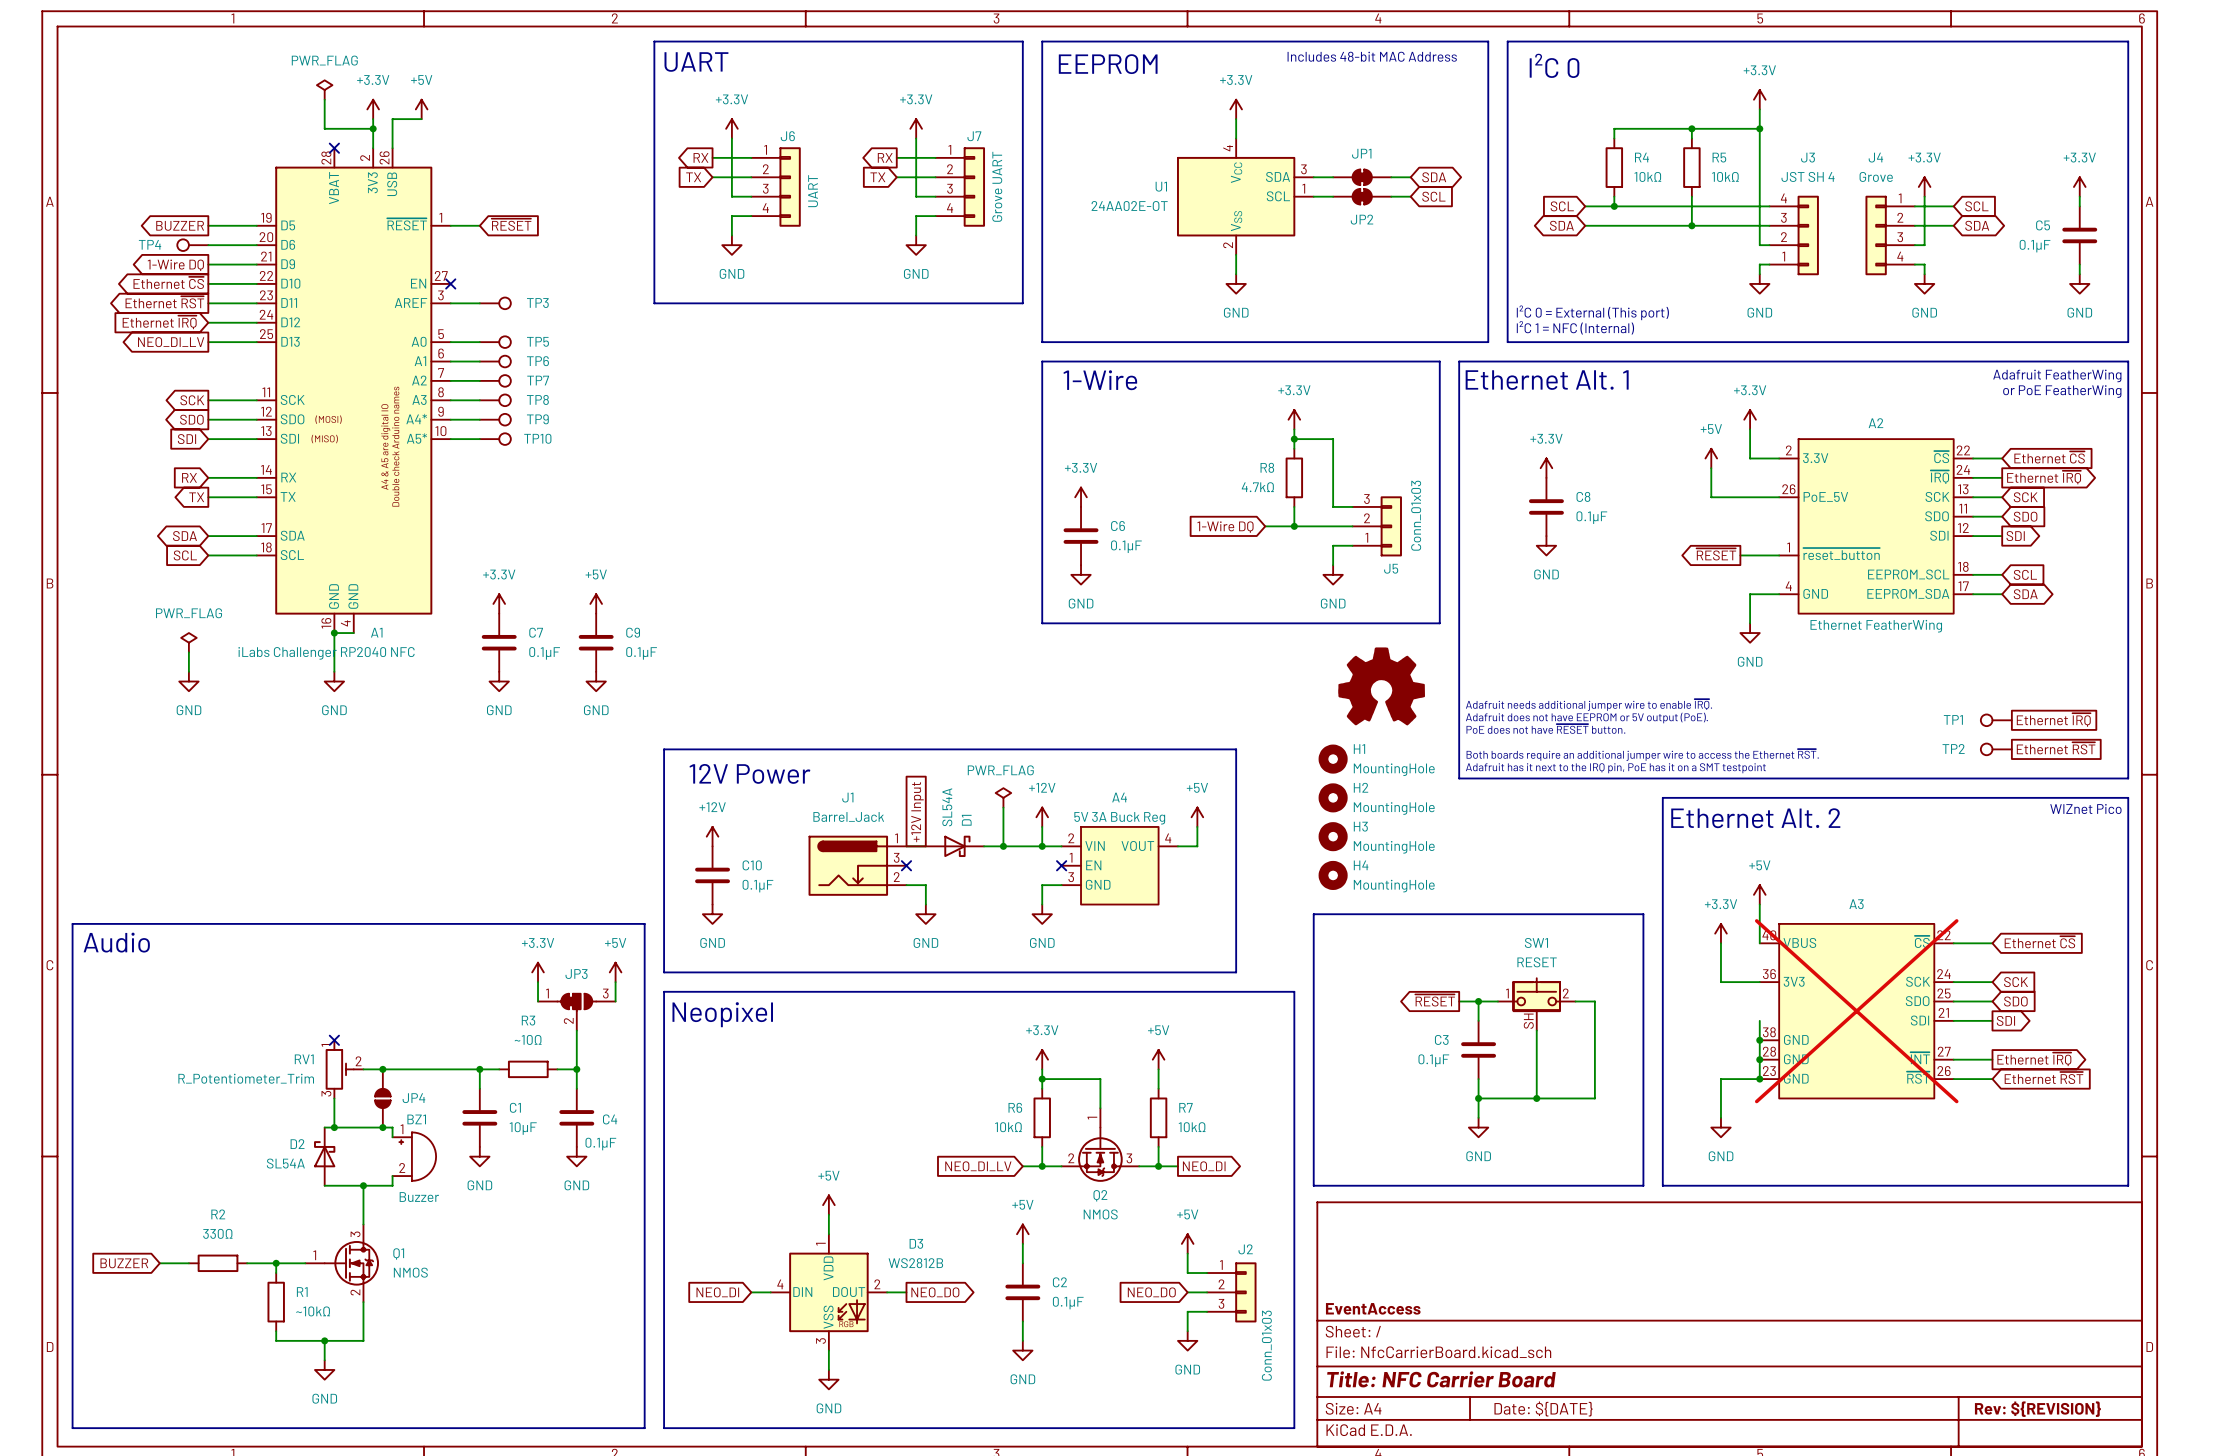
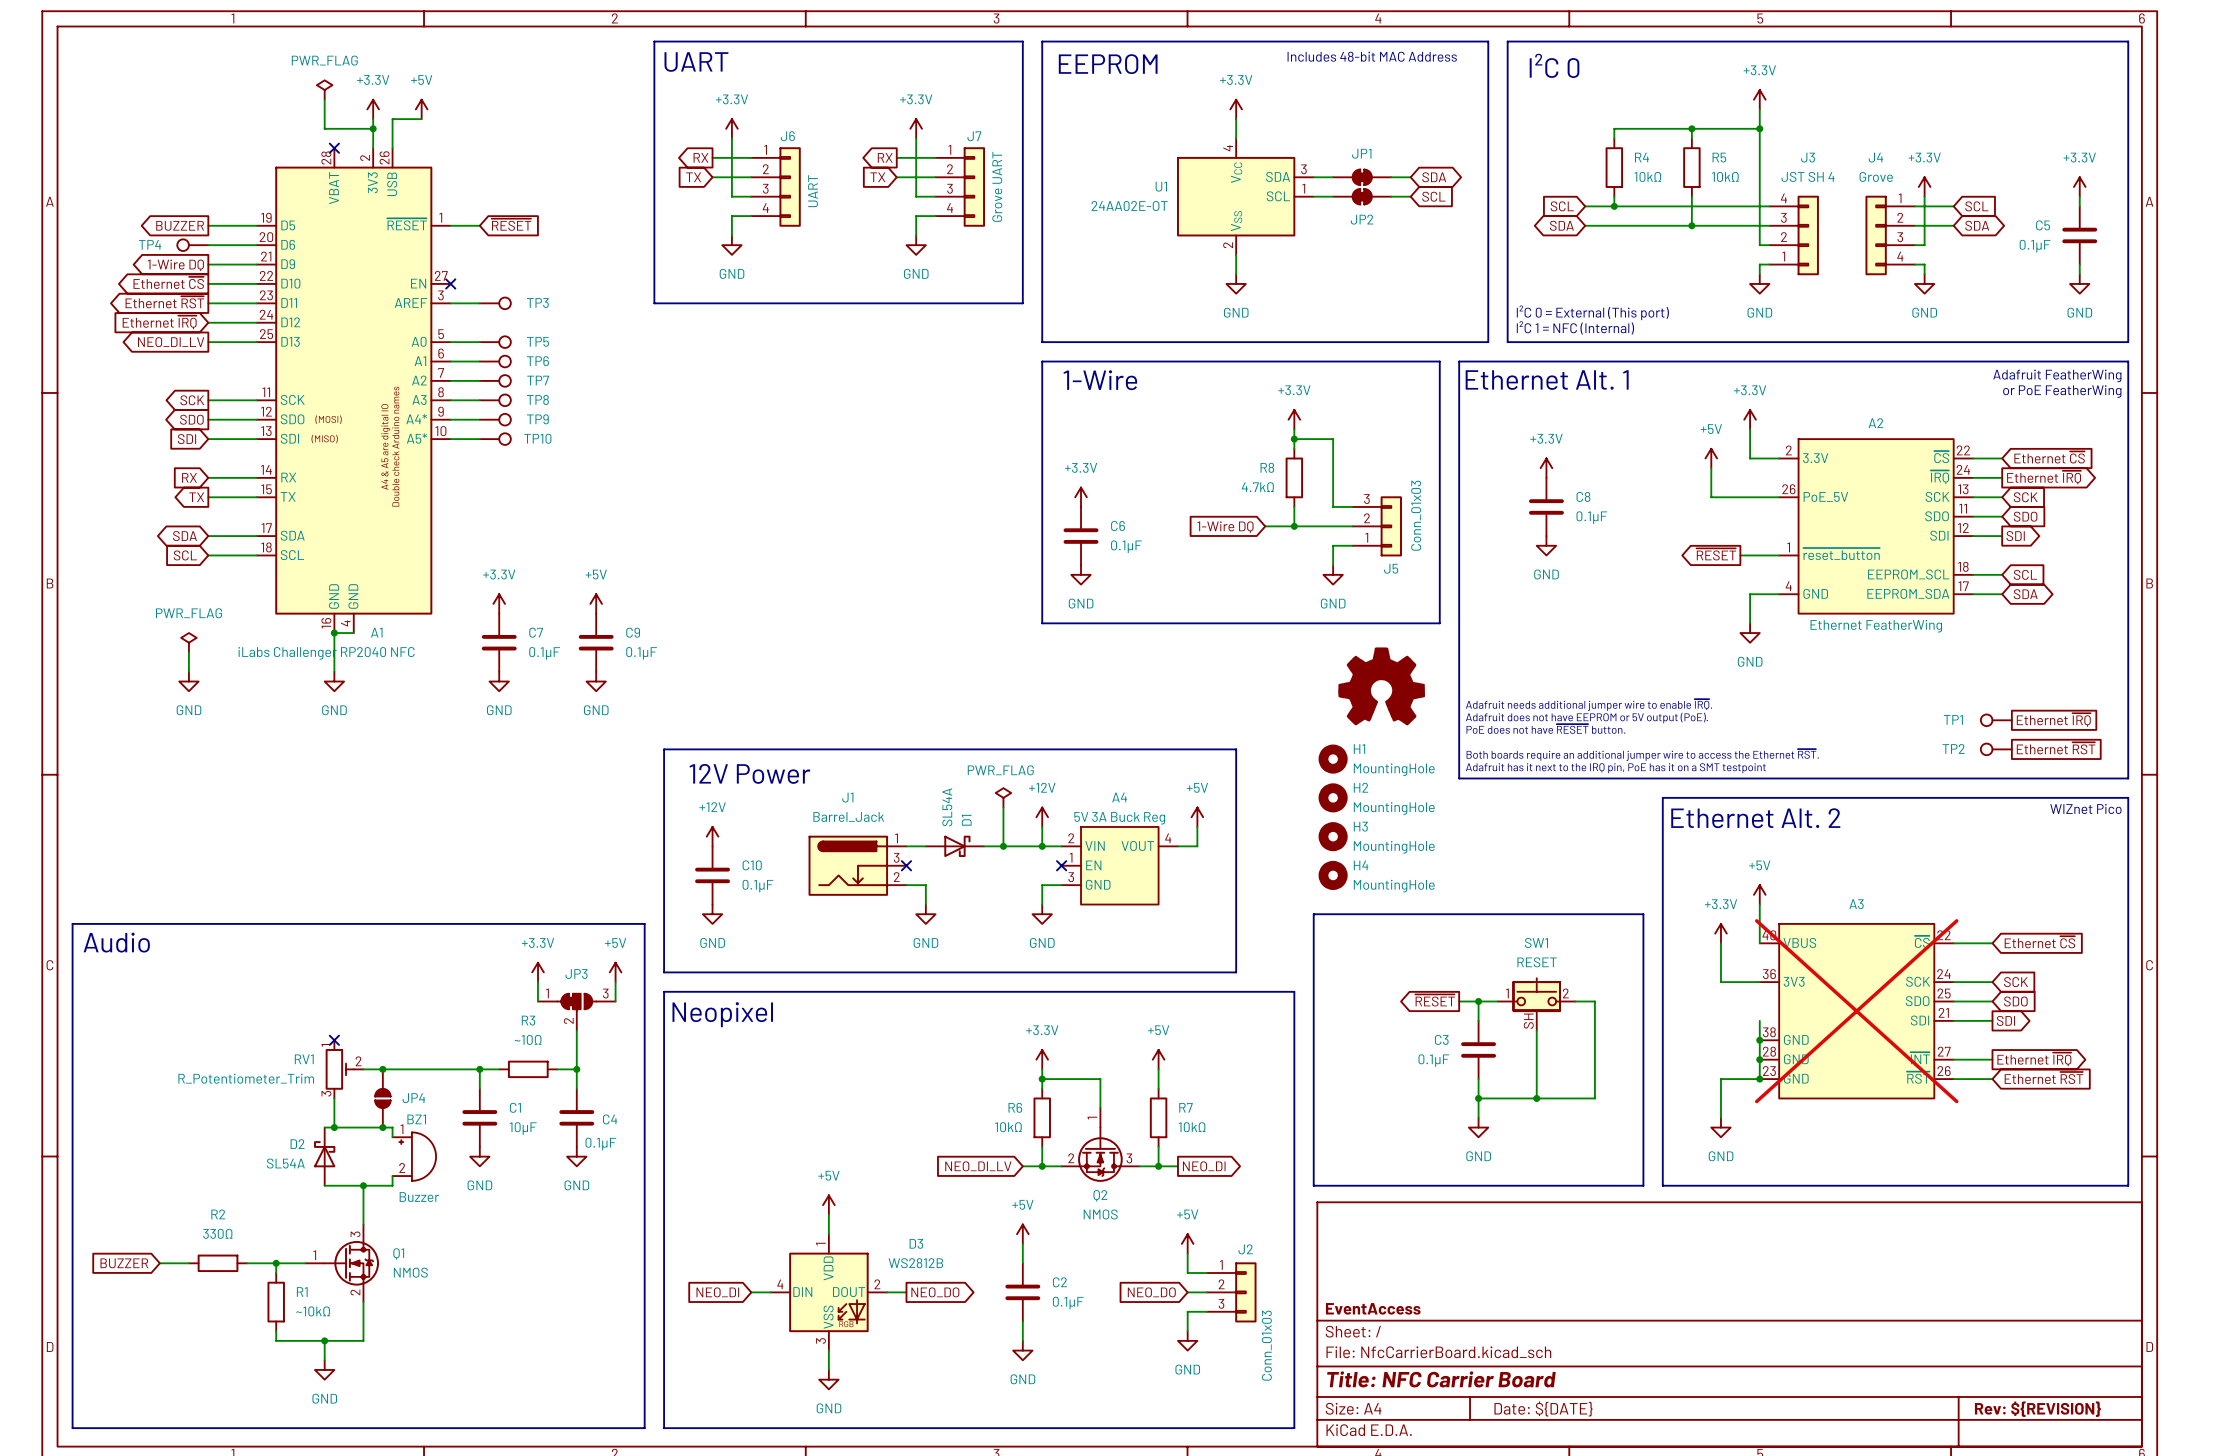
global label: +12V Input (917, 812) -> none

